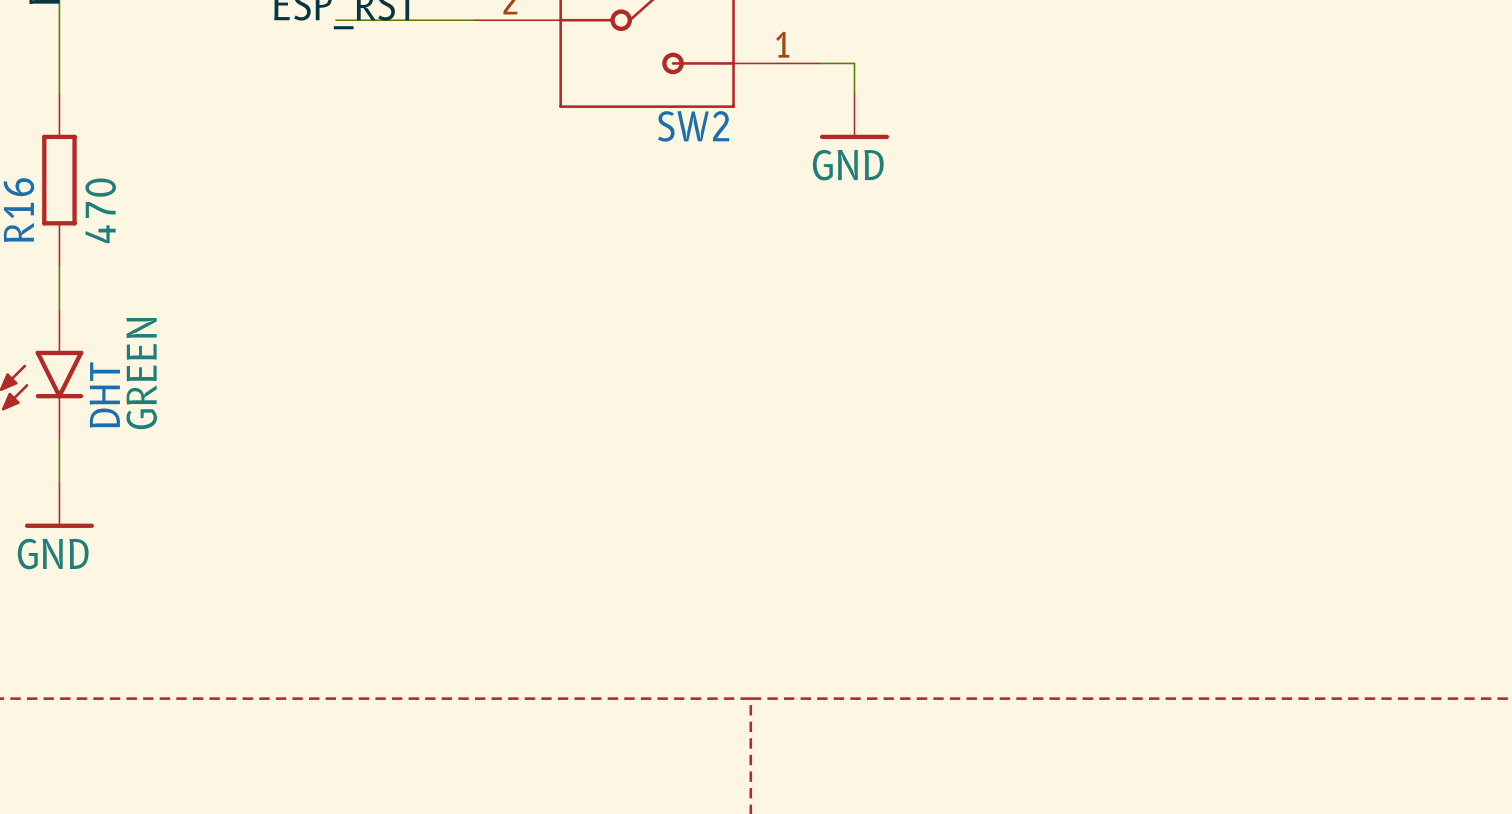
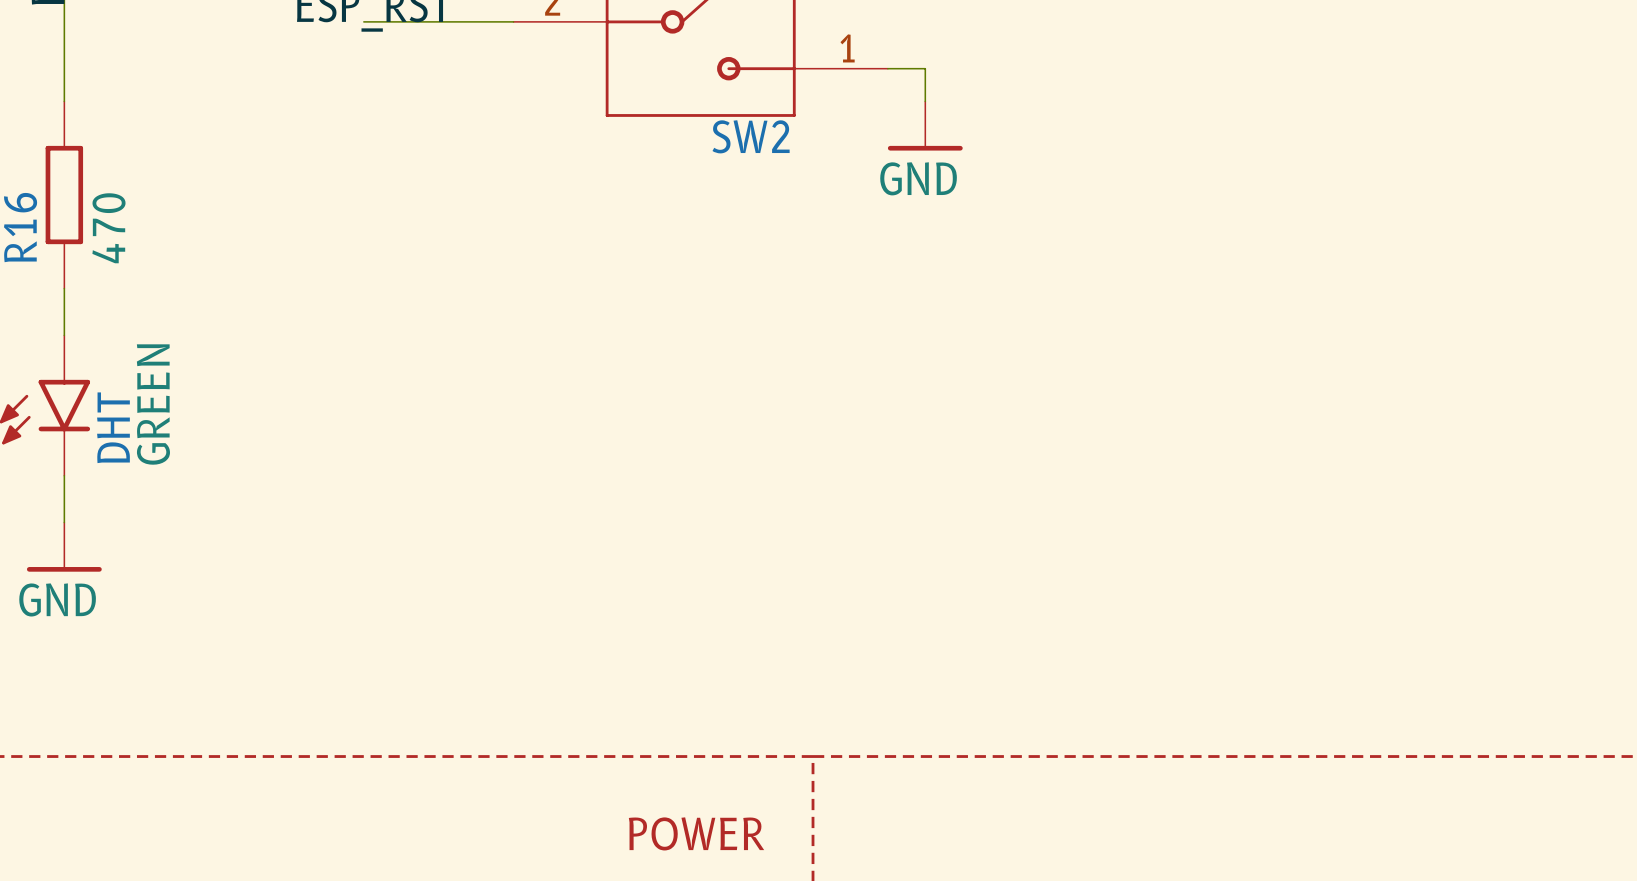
text: none -> POWER (696, 833)

